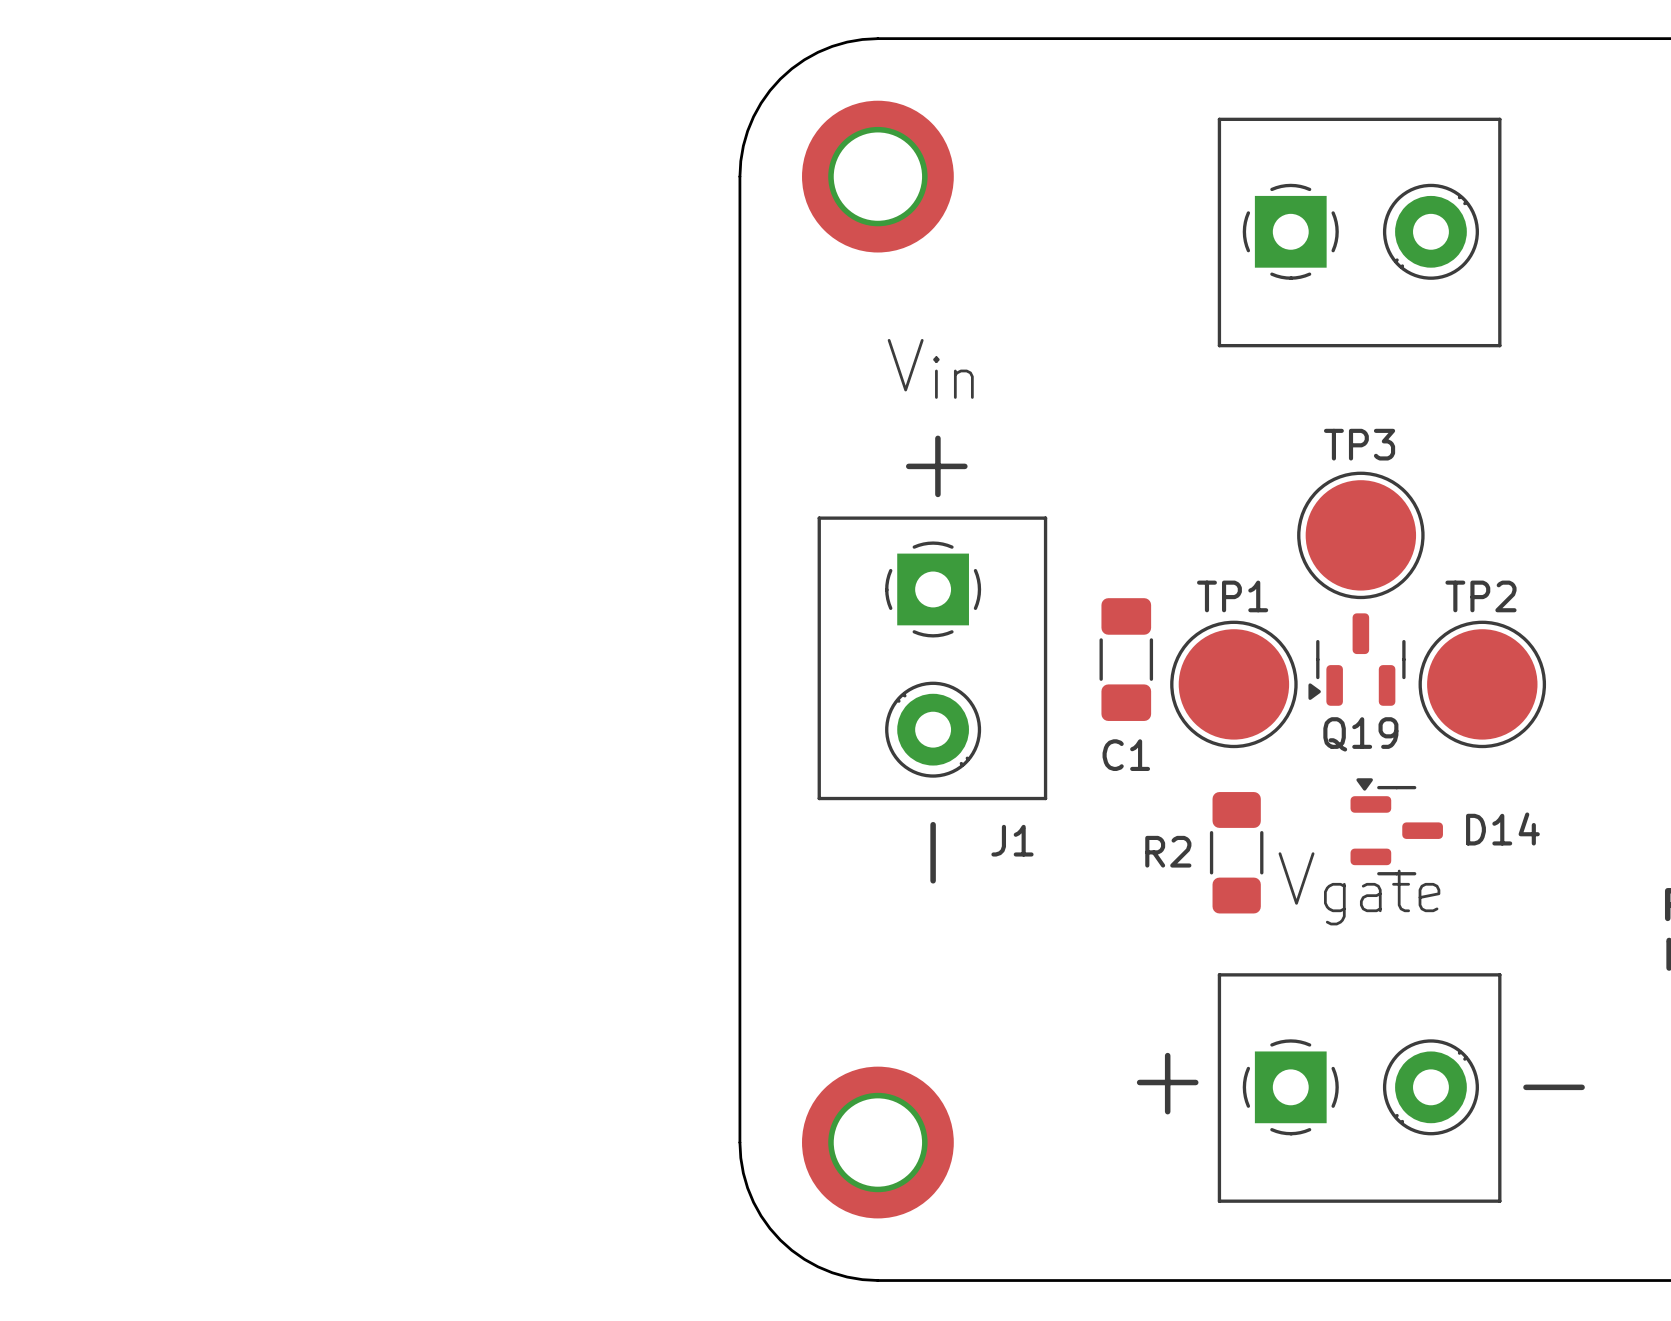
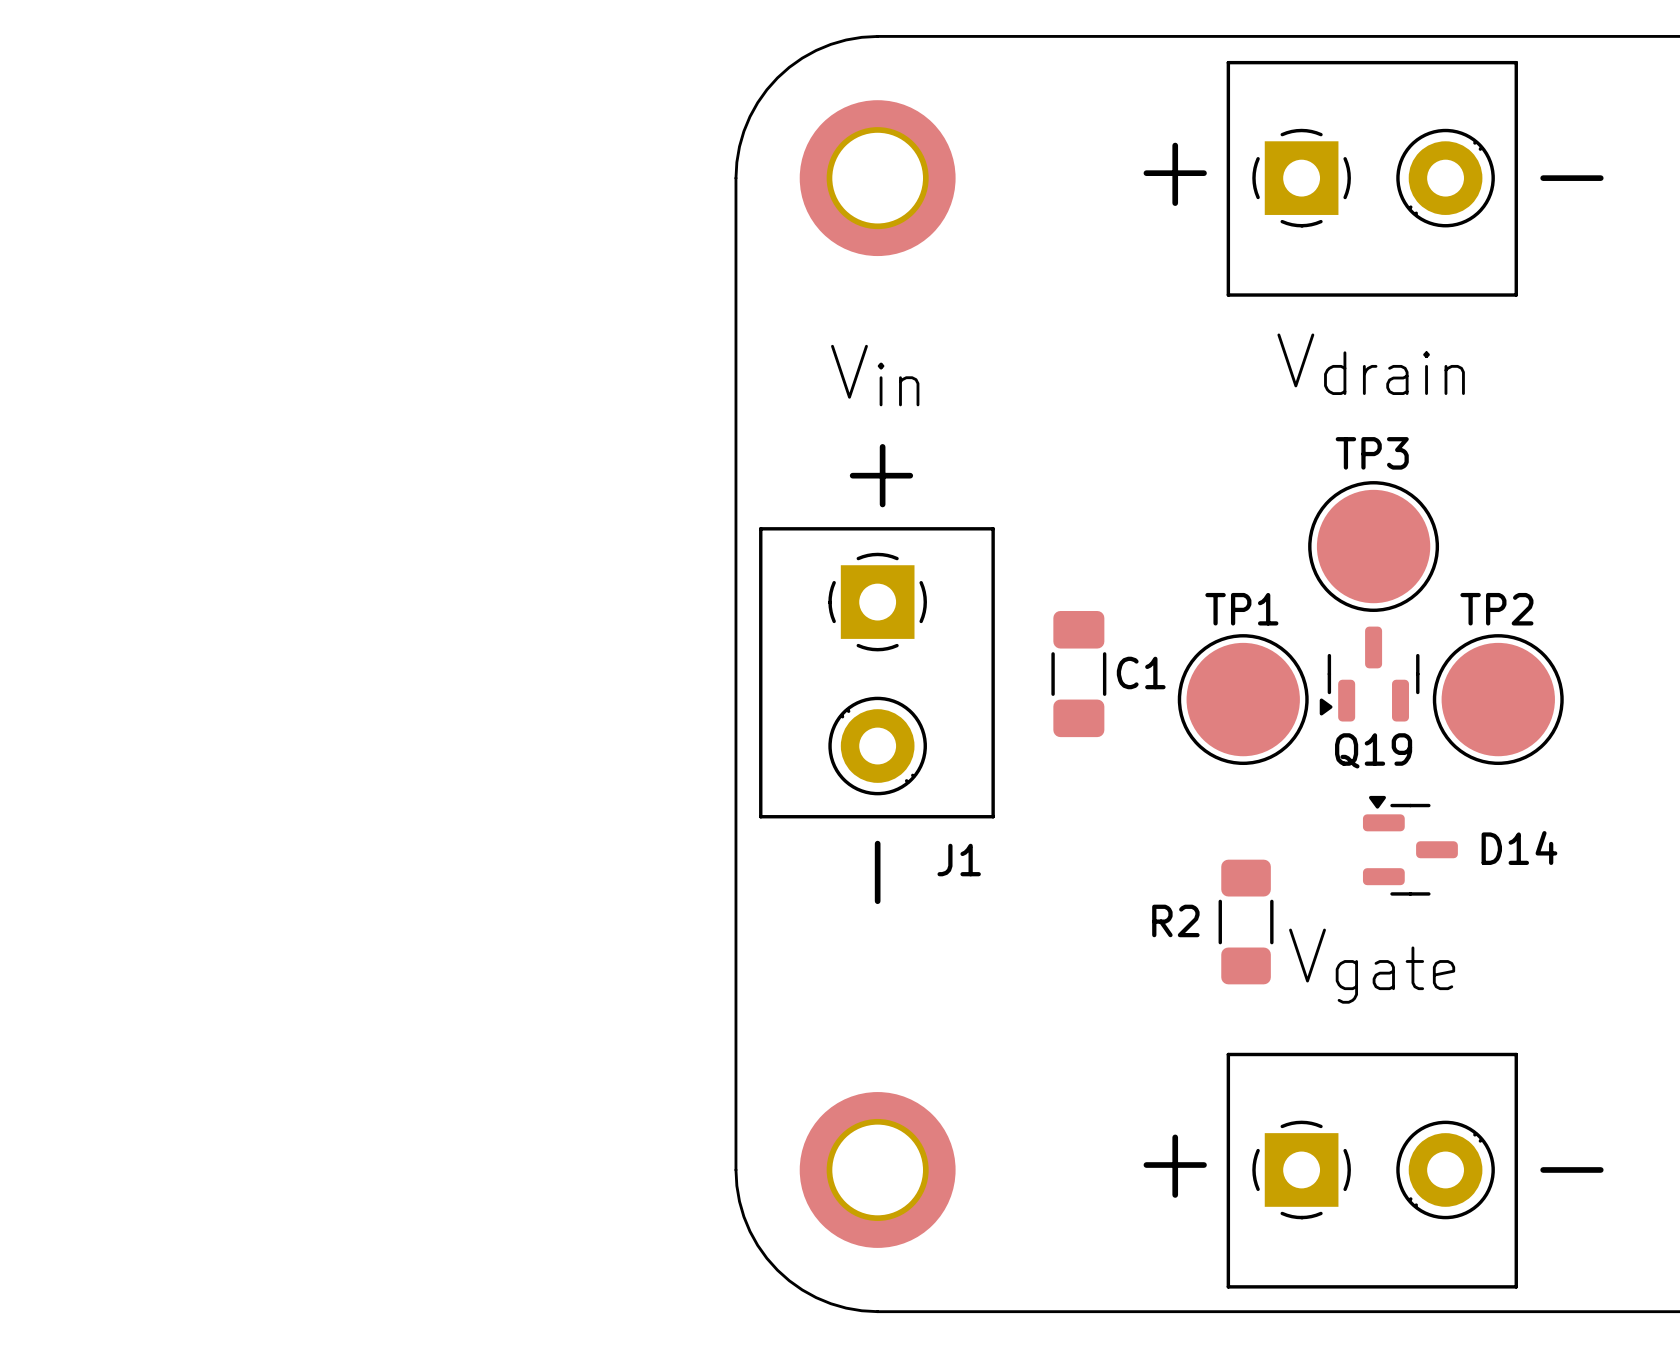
part: none -> (1373, 178)
part: (1359, 232) -> none
J1 position: (932, 659) -> (876, 674)
C1 position: (1126, 659) -> (1078, 674)
C1 name position: C1 (1126, 755) -> C1 (1141, 672)
R2 position: (1236, 852) -> (1246, 922)
part position: (1360, 1088) -> (1373, 1170)

